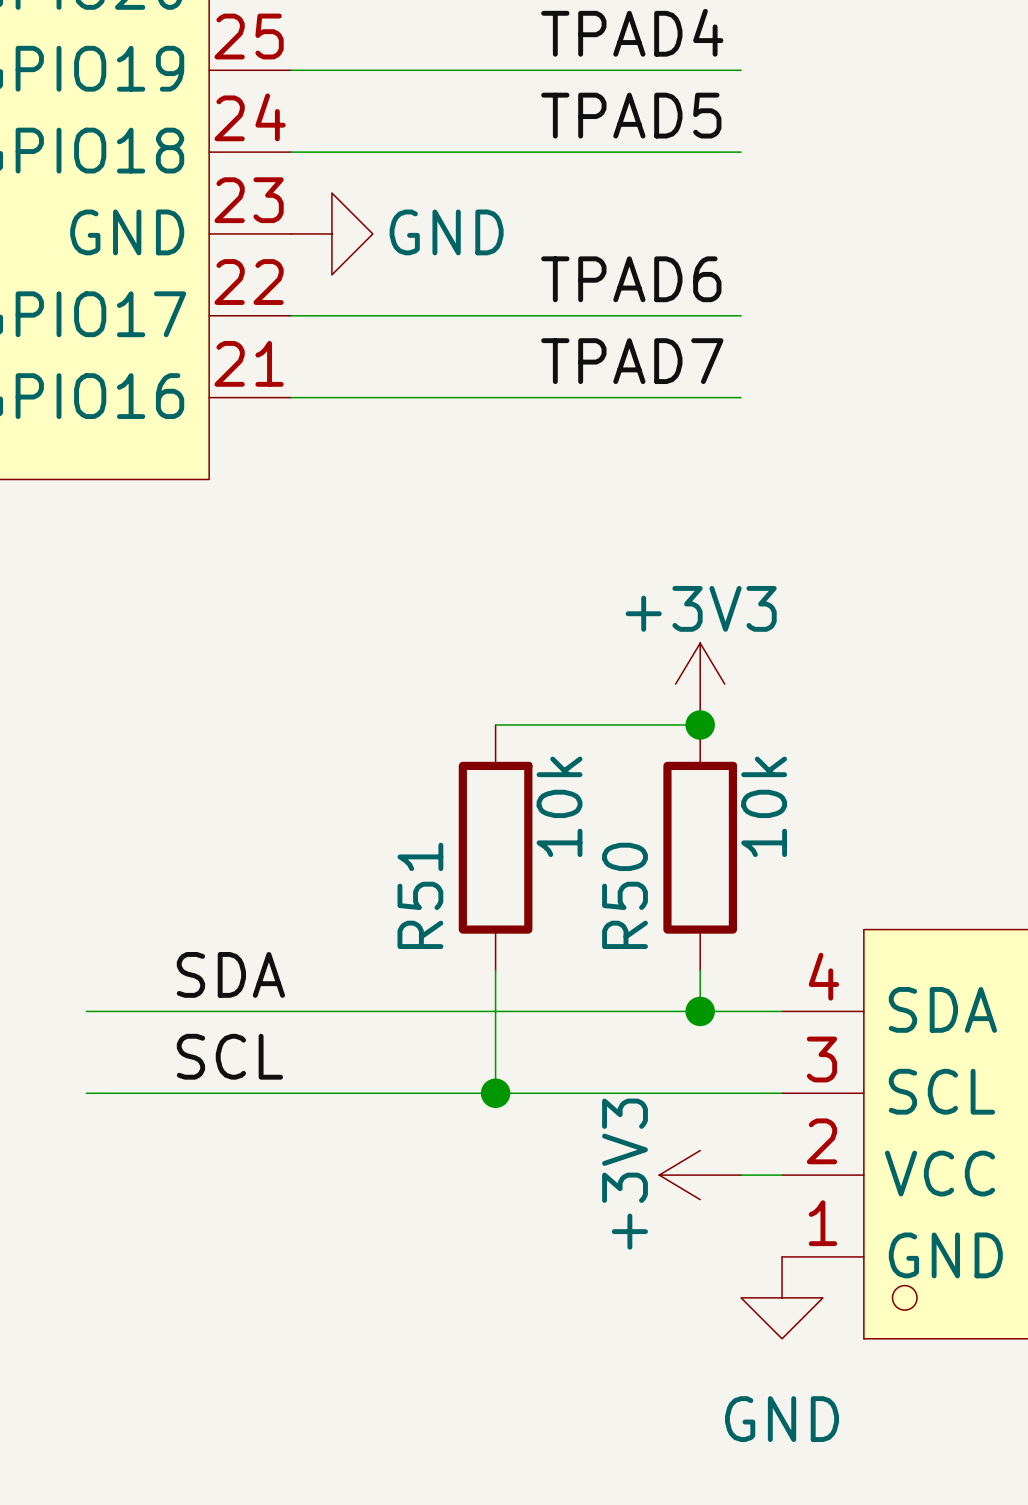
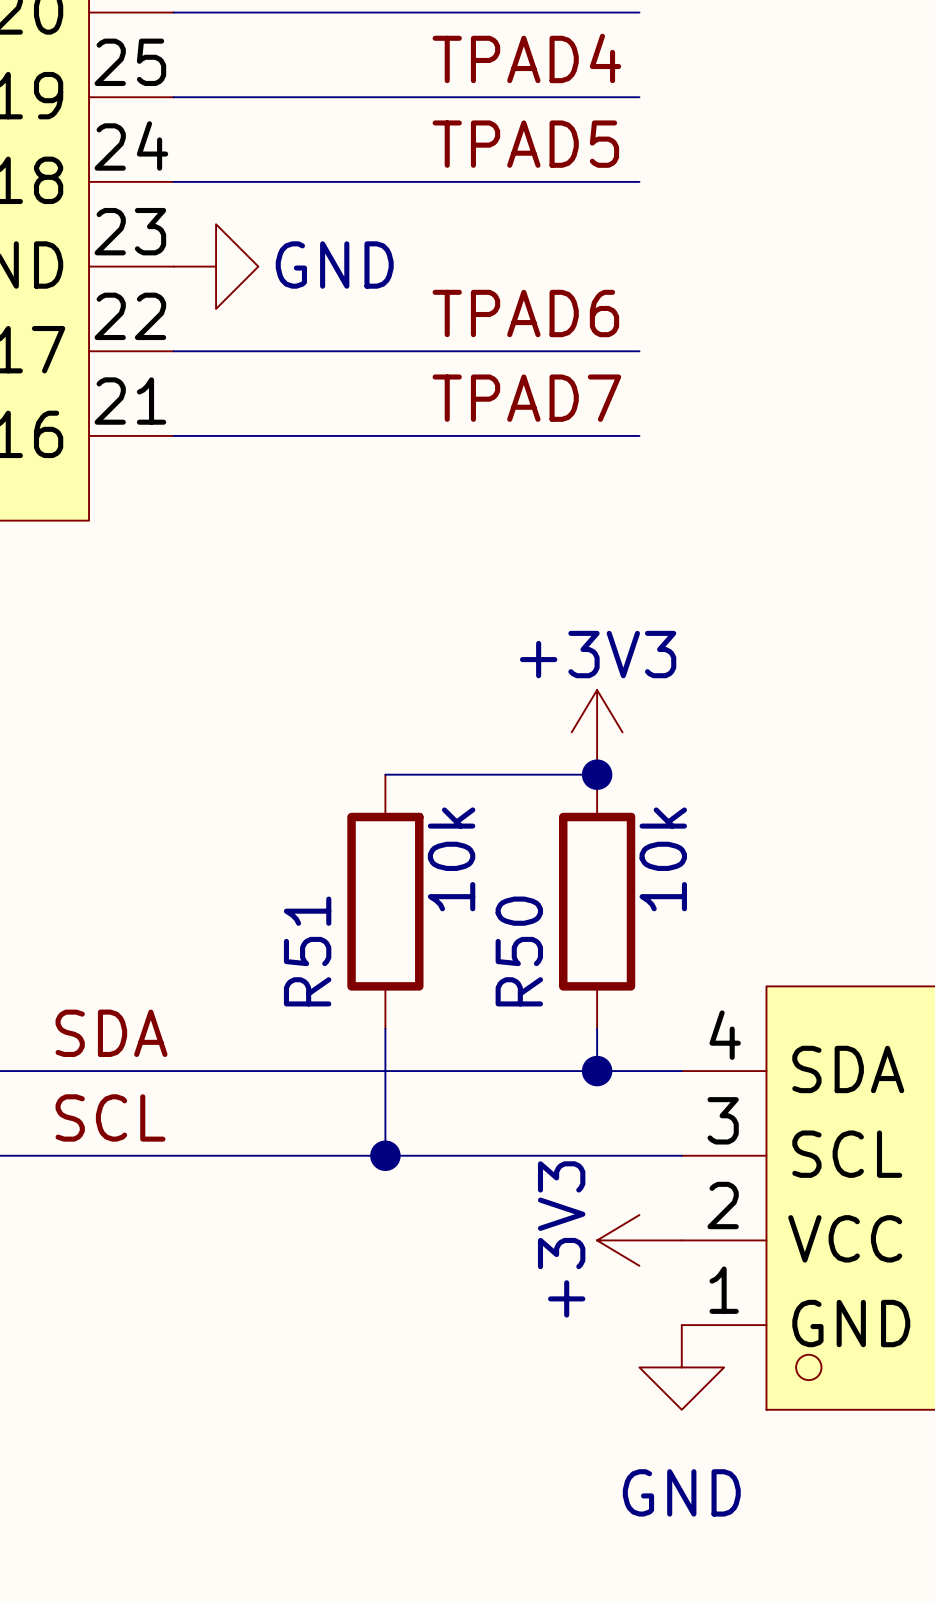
power symbol position: +3V3 (700, 1175) -> +3V3 (639, 1240)

